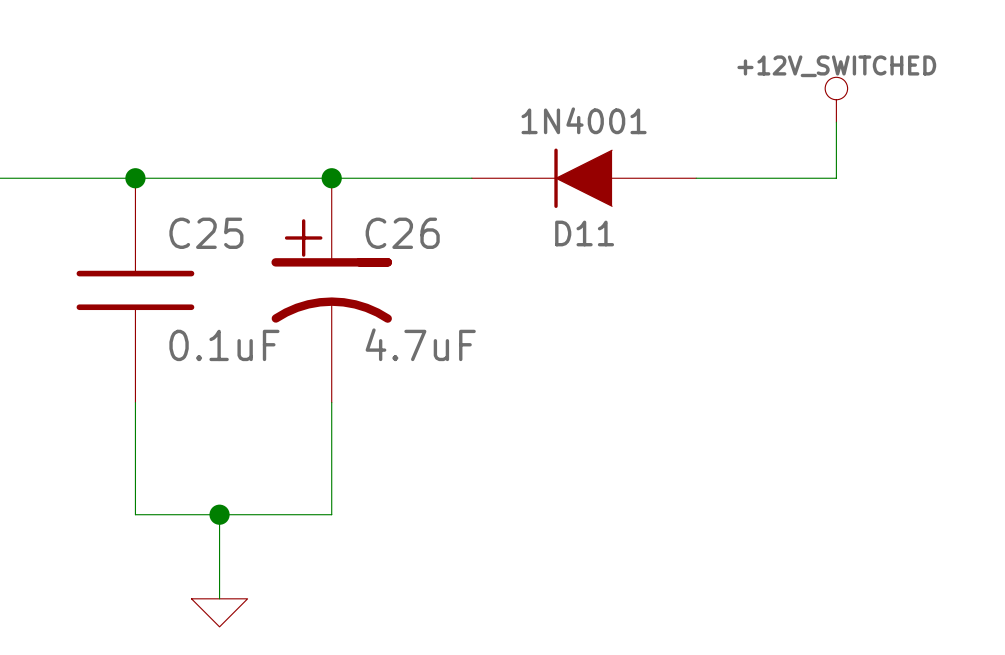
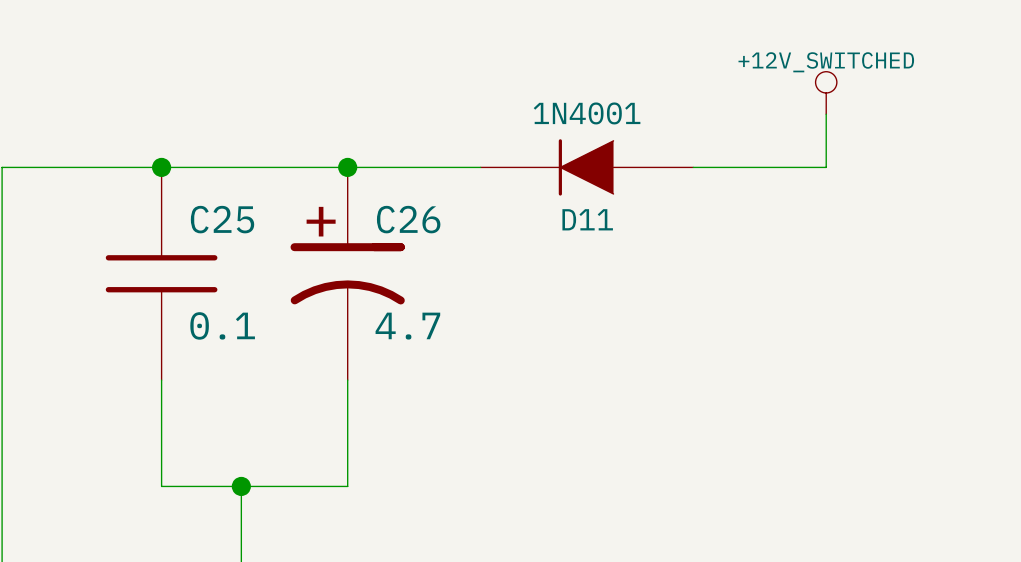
C26 value: 4.7uF (420, 344) -> 4.7 (407, 326)
C25 value: 0.1uF (224, 345) -> 0.1 (222, 325)

